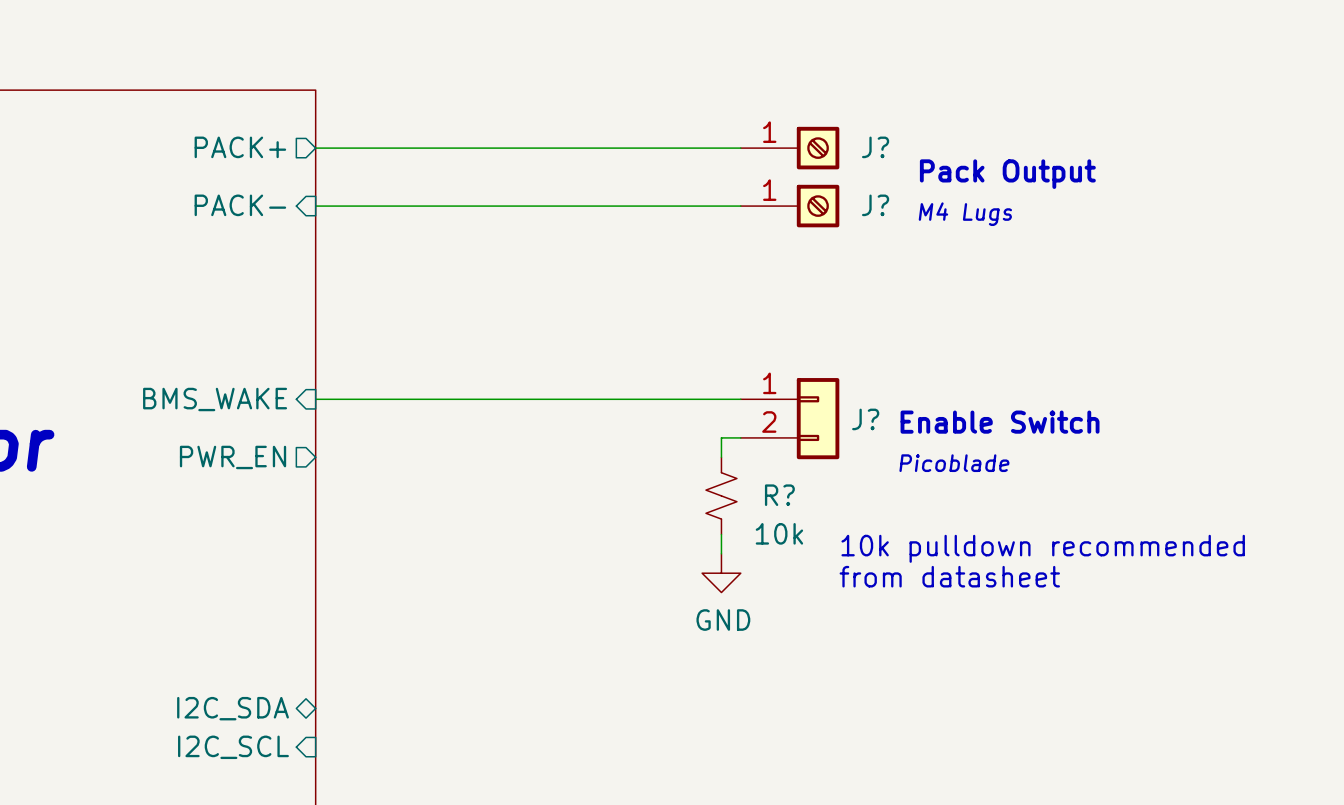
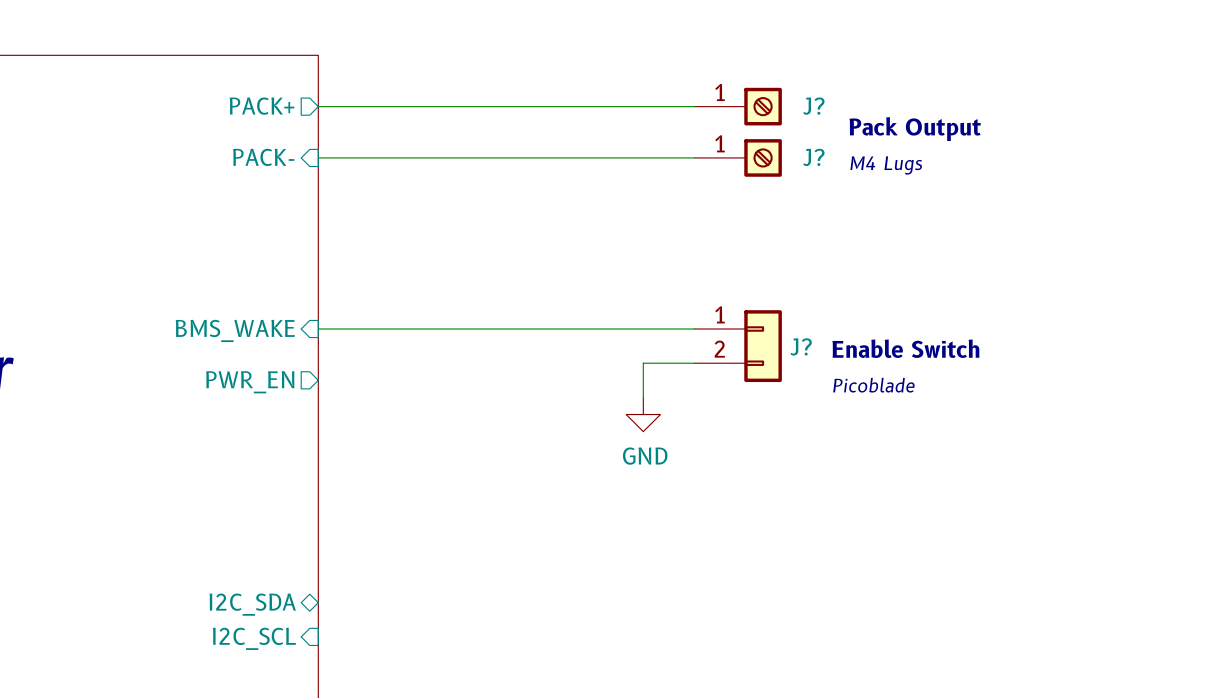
wire: (721, 437) (721, 457) -> (677, 363) (643, 363) (643, 397)
R?: 10k (721, 495) -> none
wire: (721, 534) (721, 553) -> none
text: 10k pulldown recommended (1043, 548) -> none
power symbol position: GND (721, 573) -> GND (643, 414)
text: from datasheet (949, 576) -> none

